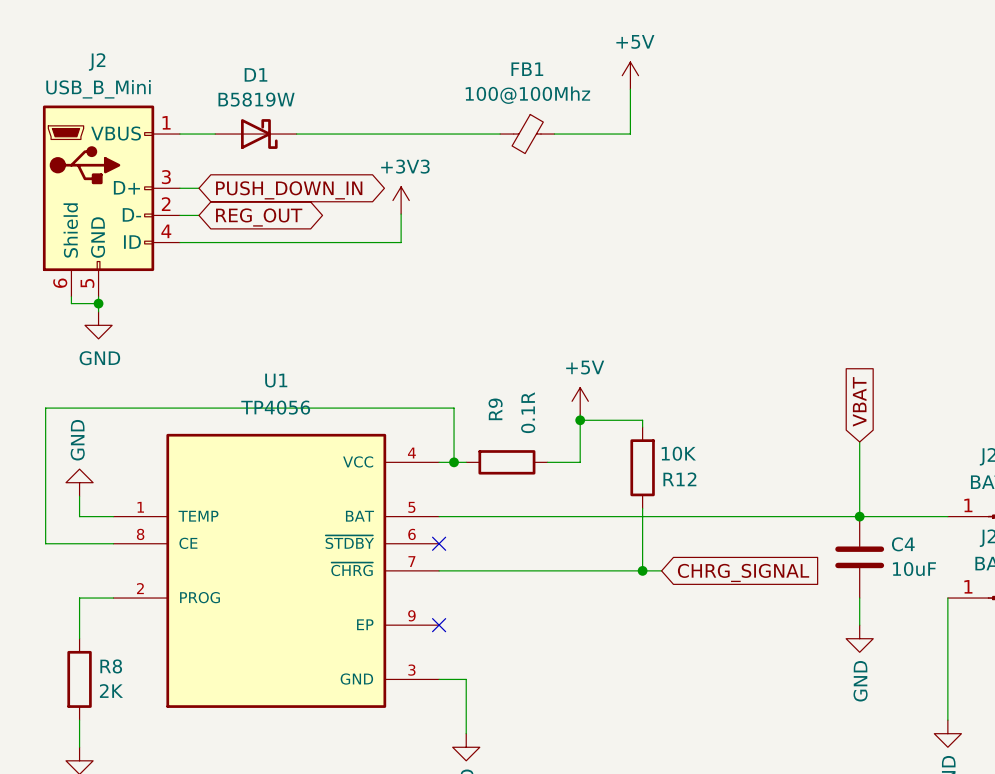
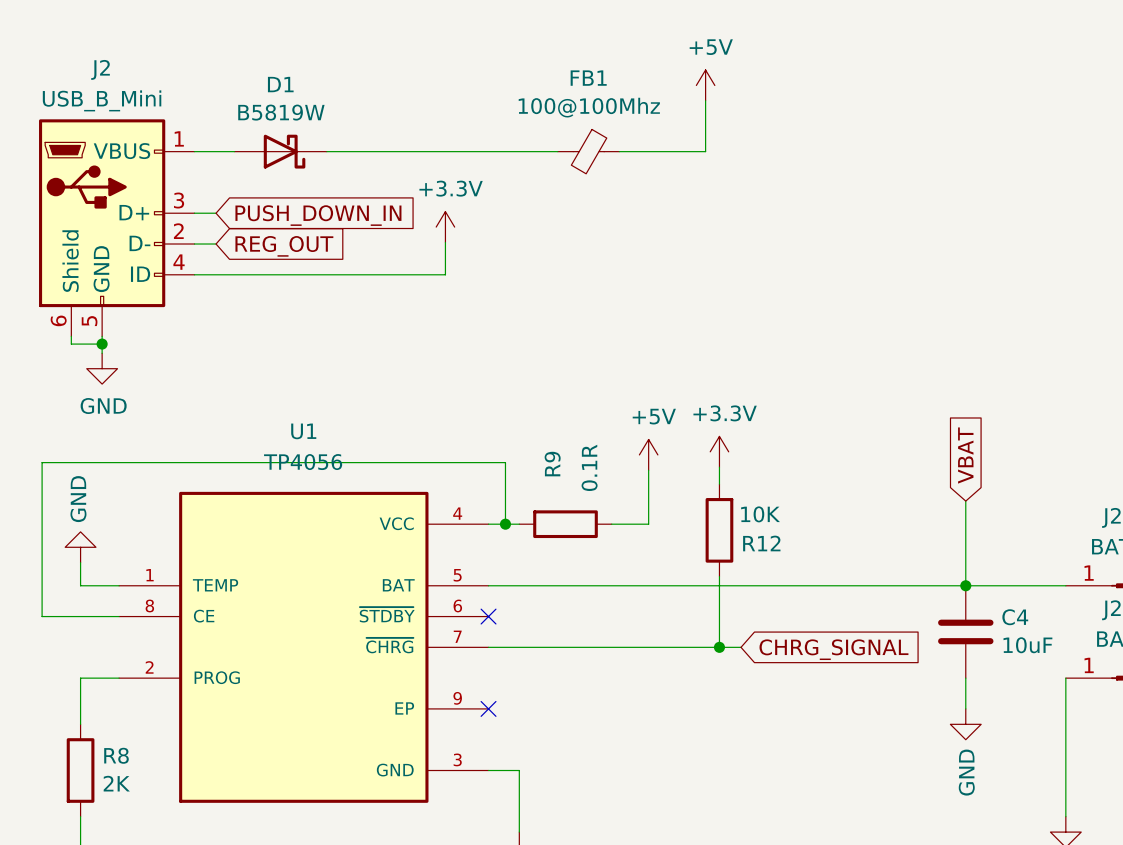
global label shape: bidirectional (289, 190) -> input (318, 215)
power symbol: +3V3 (401, 200) -> +3.3V (445, 227)
global label shape: bidirectional (259, 217) -> input (284, 246)
power symbol: none -> +3.3V (719, 451)
wire: (580, 420) (642, 420) -> (719, 467) (719, 476)
junction: (580, 420) -> none

